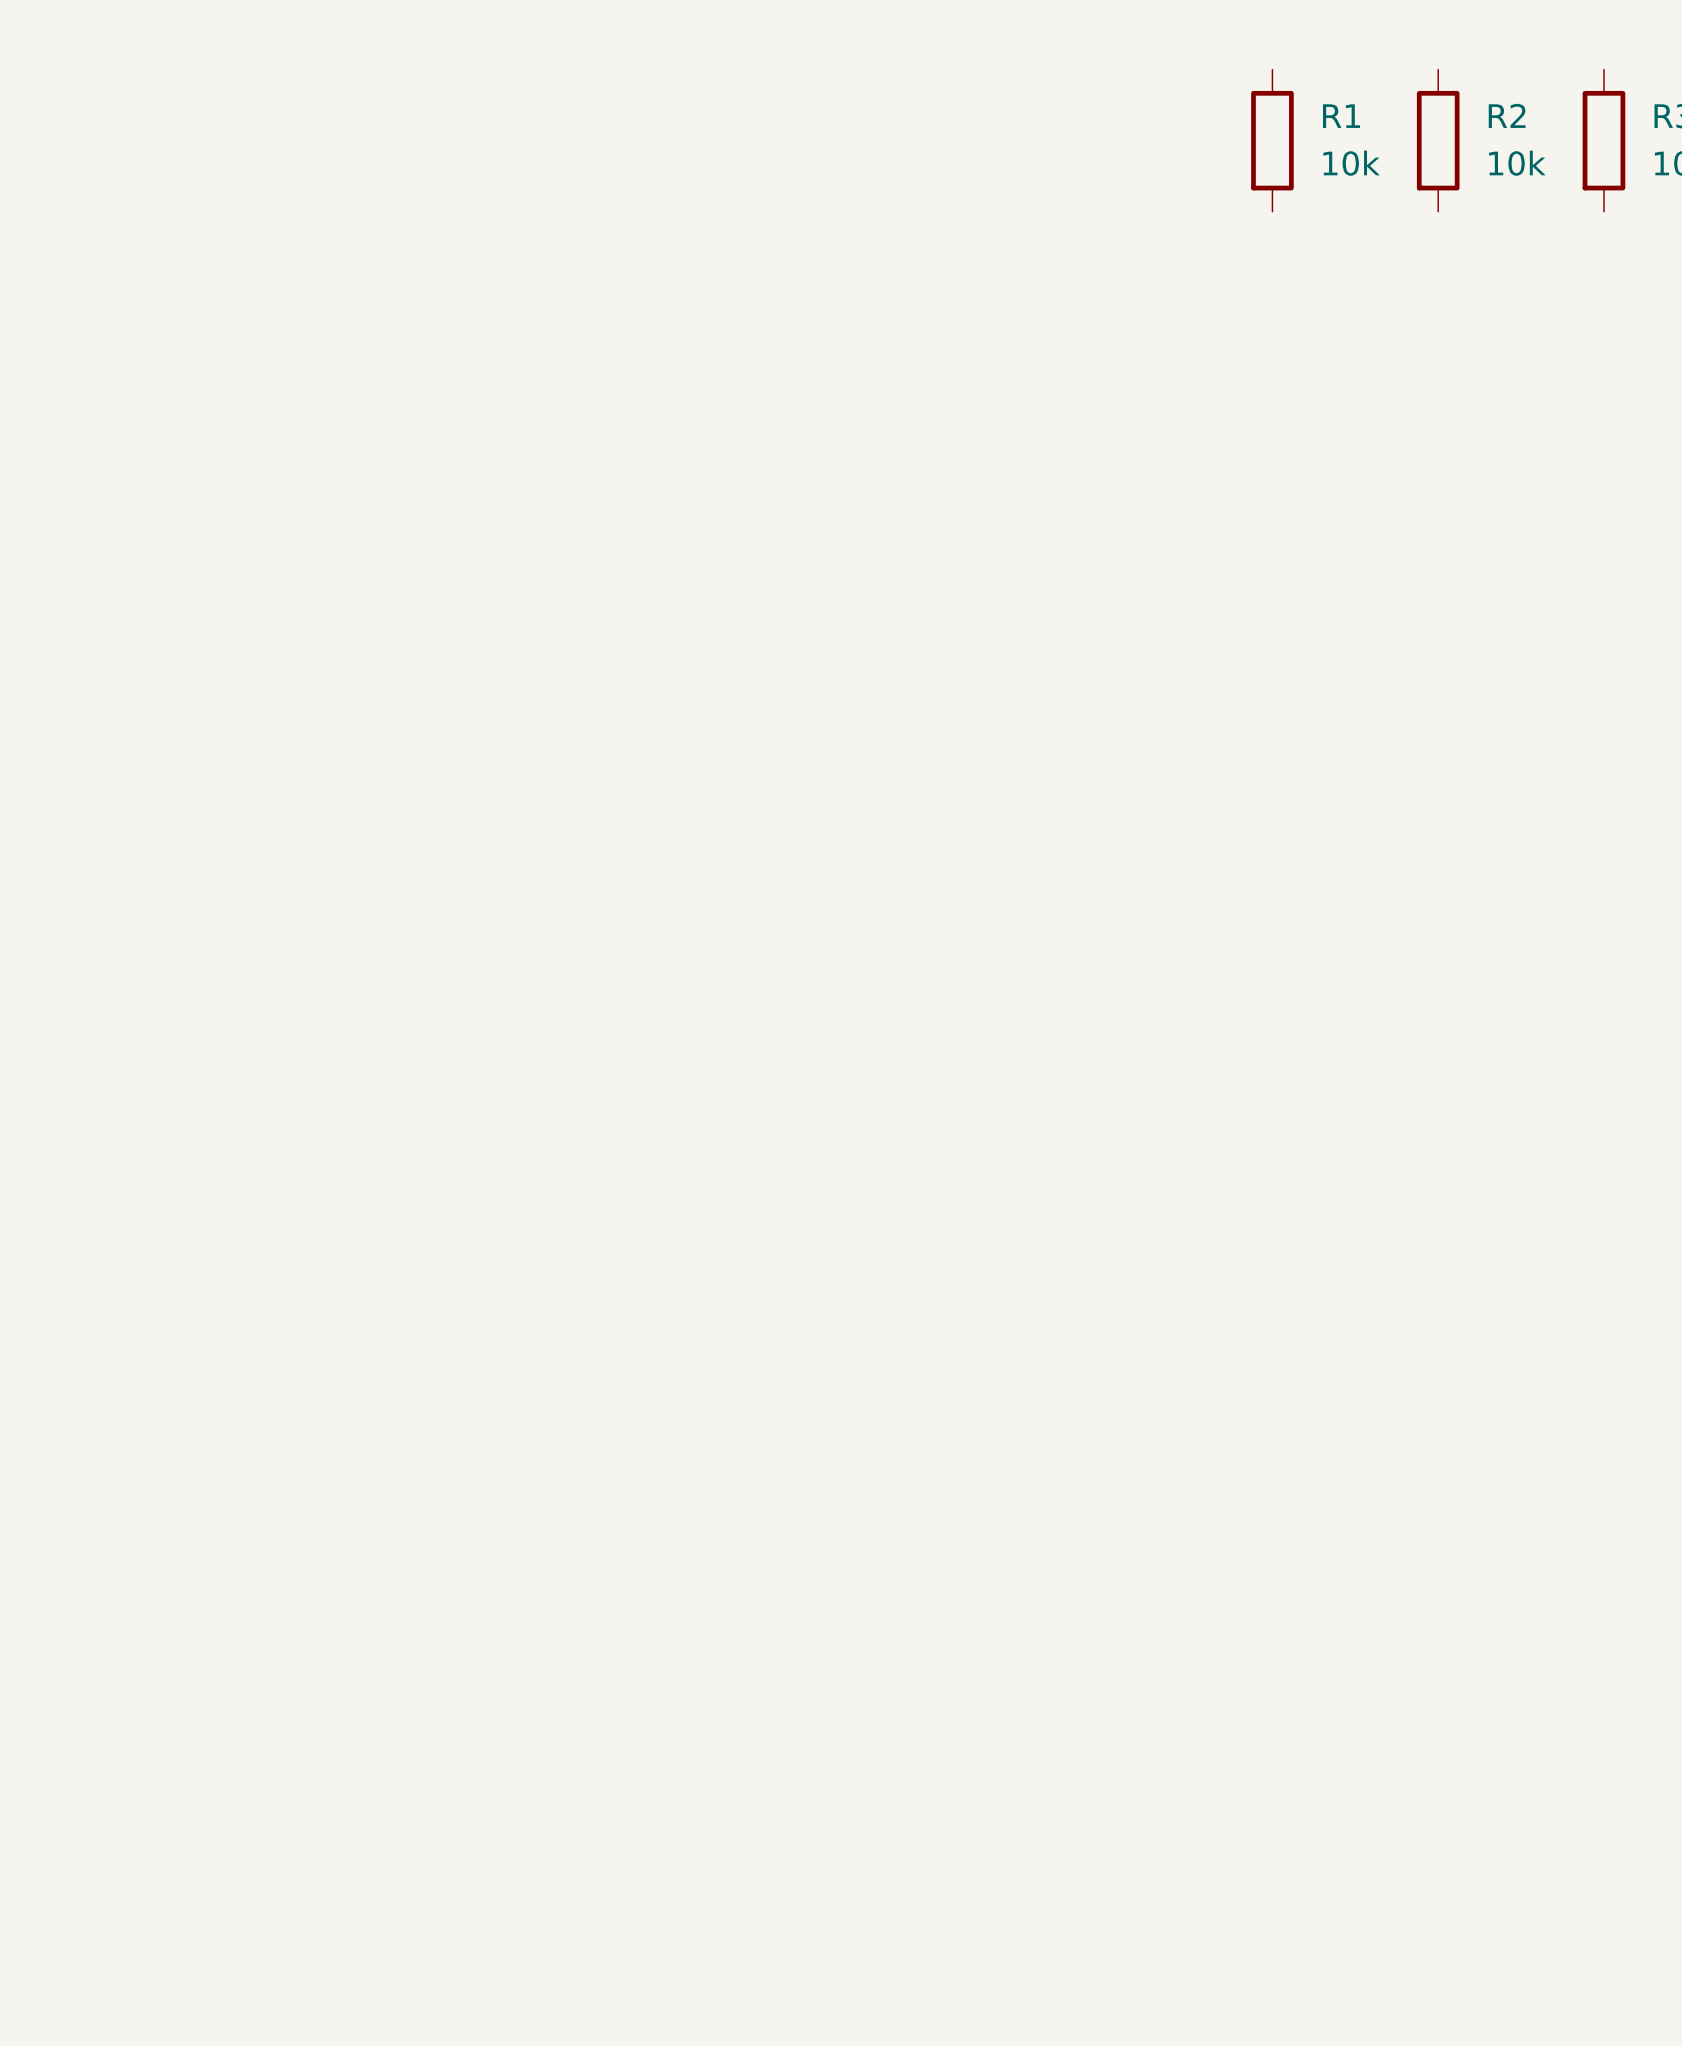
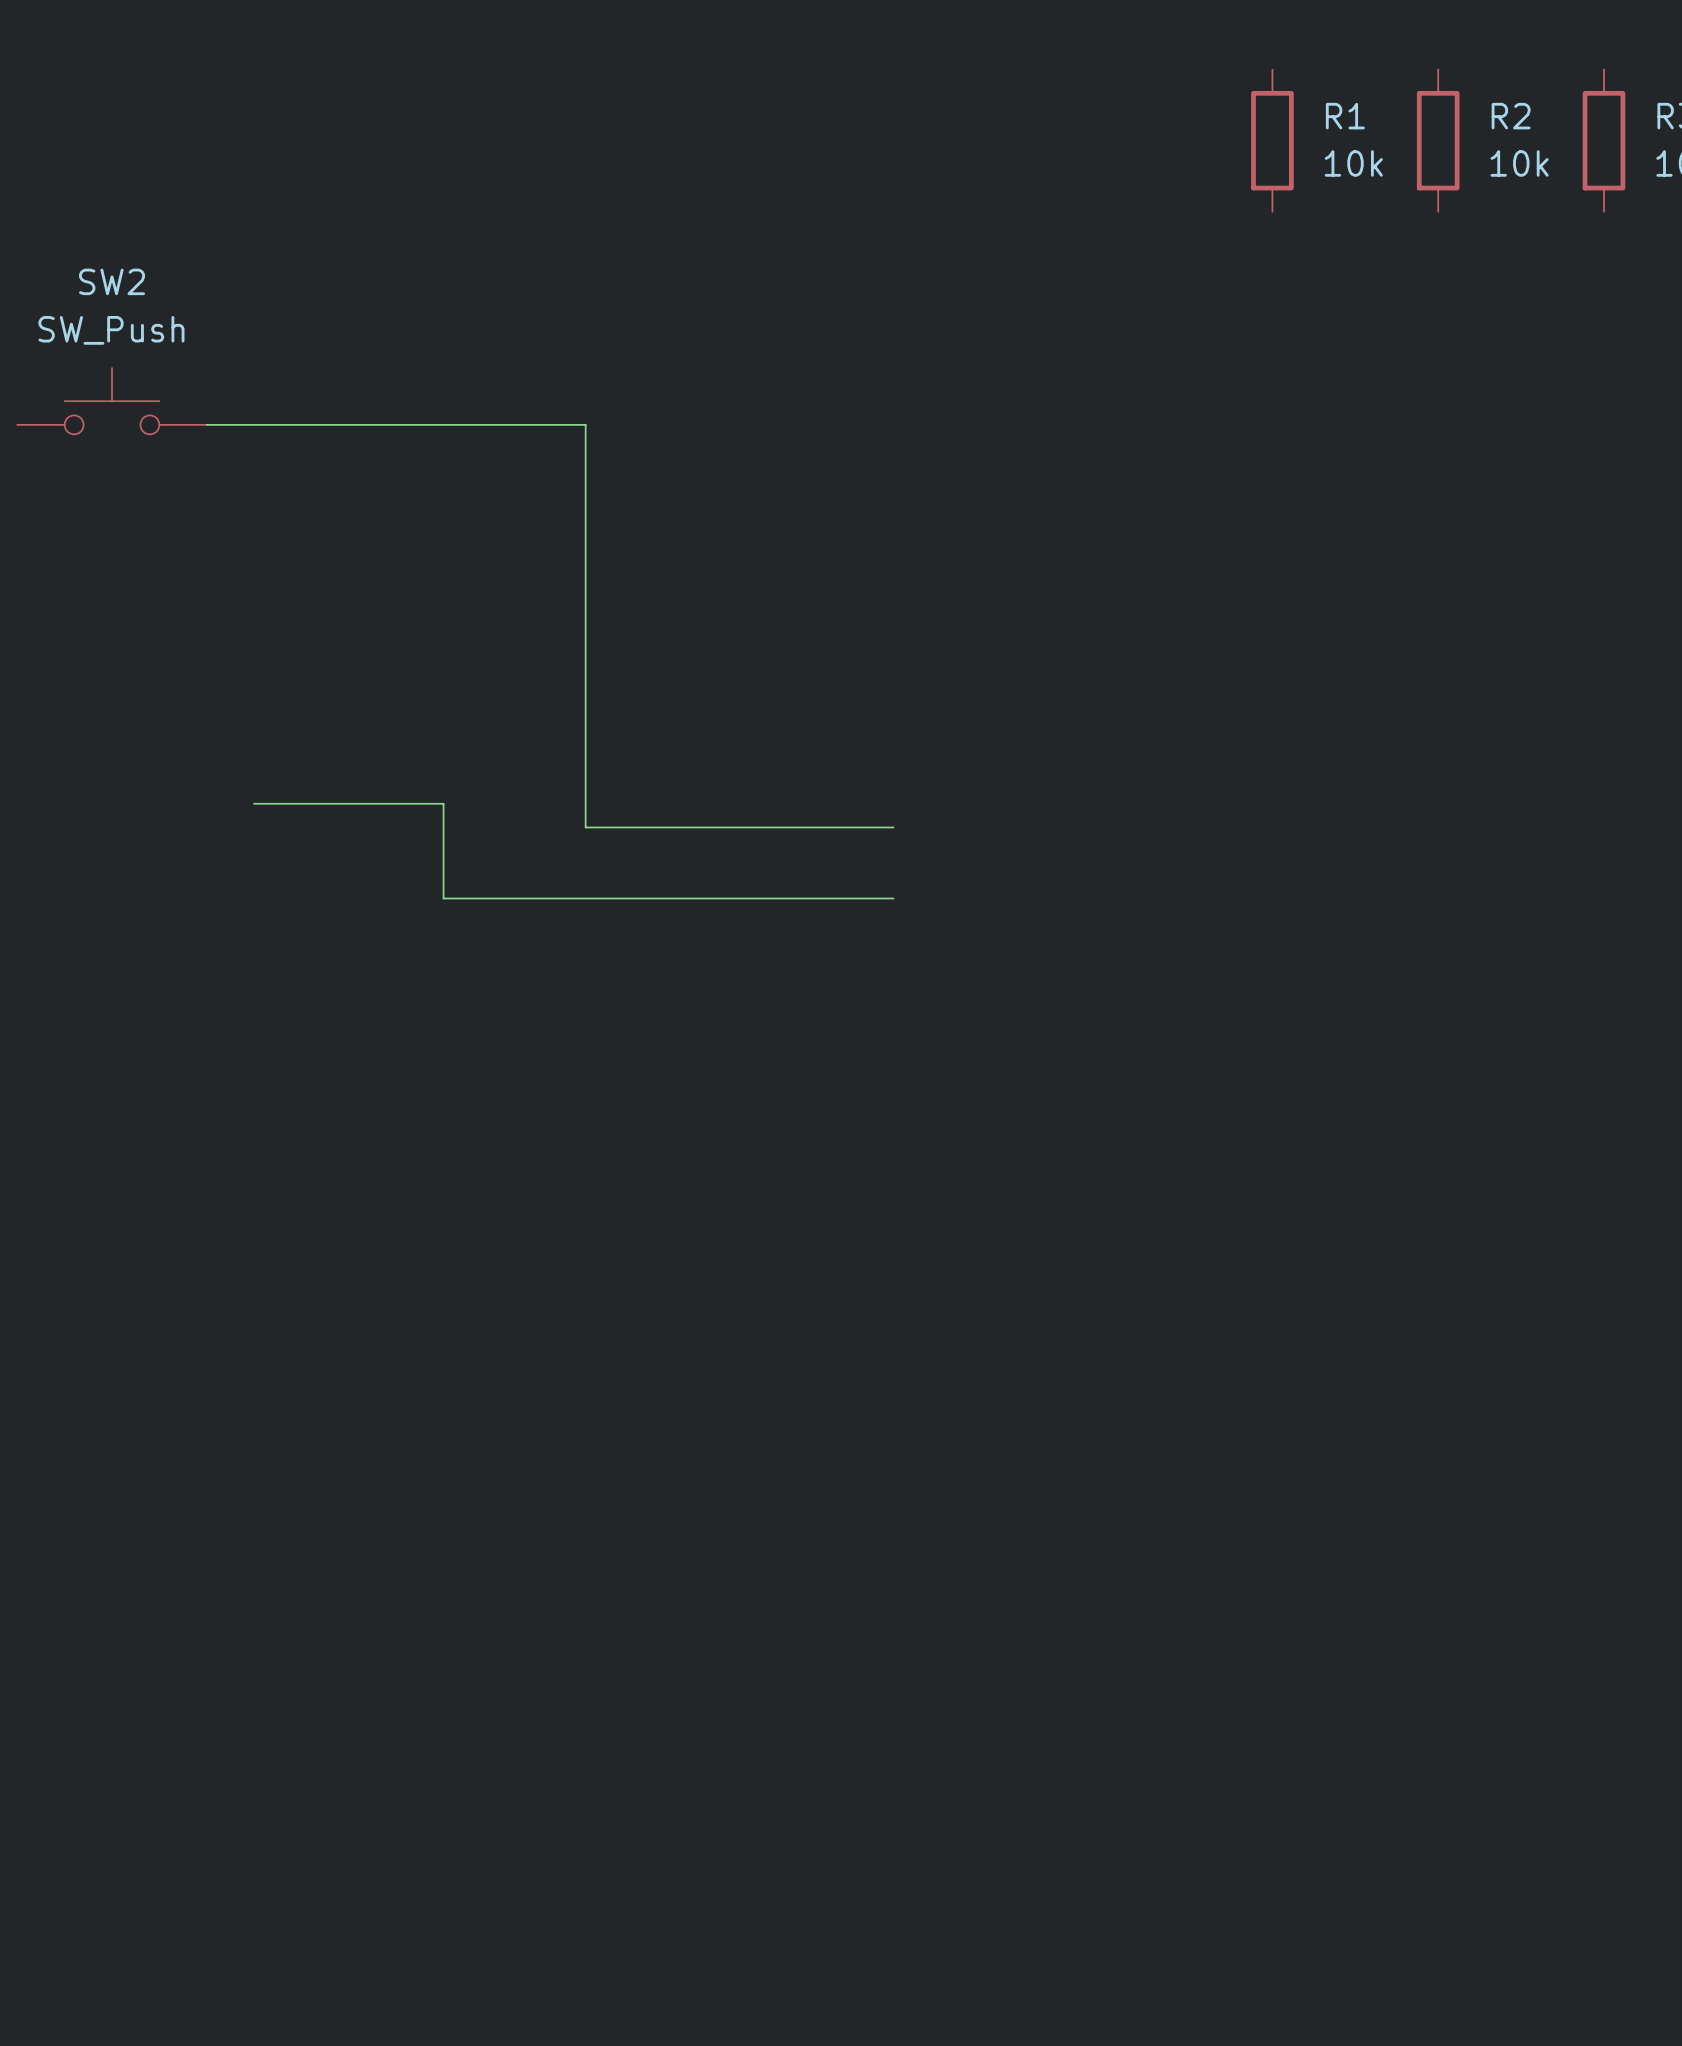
SW2: none -> SW_Push (112, 401)
wire: none -> (206, 424) (585, 424) (585, 827) (893, 827)
wire: none -> (254, 803) (443, 803) (443, 898) (893, 898)

